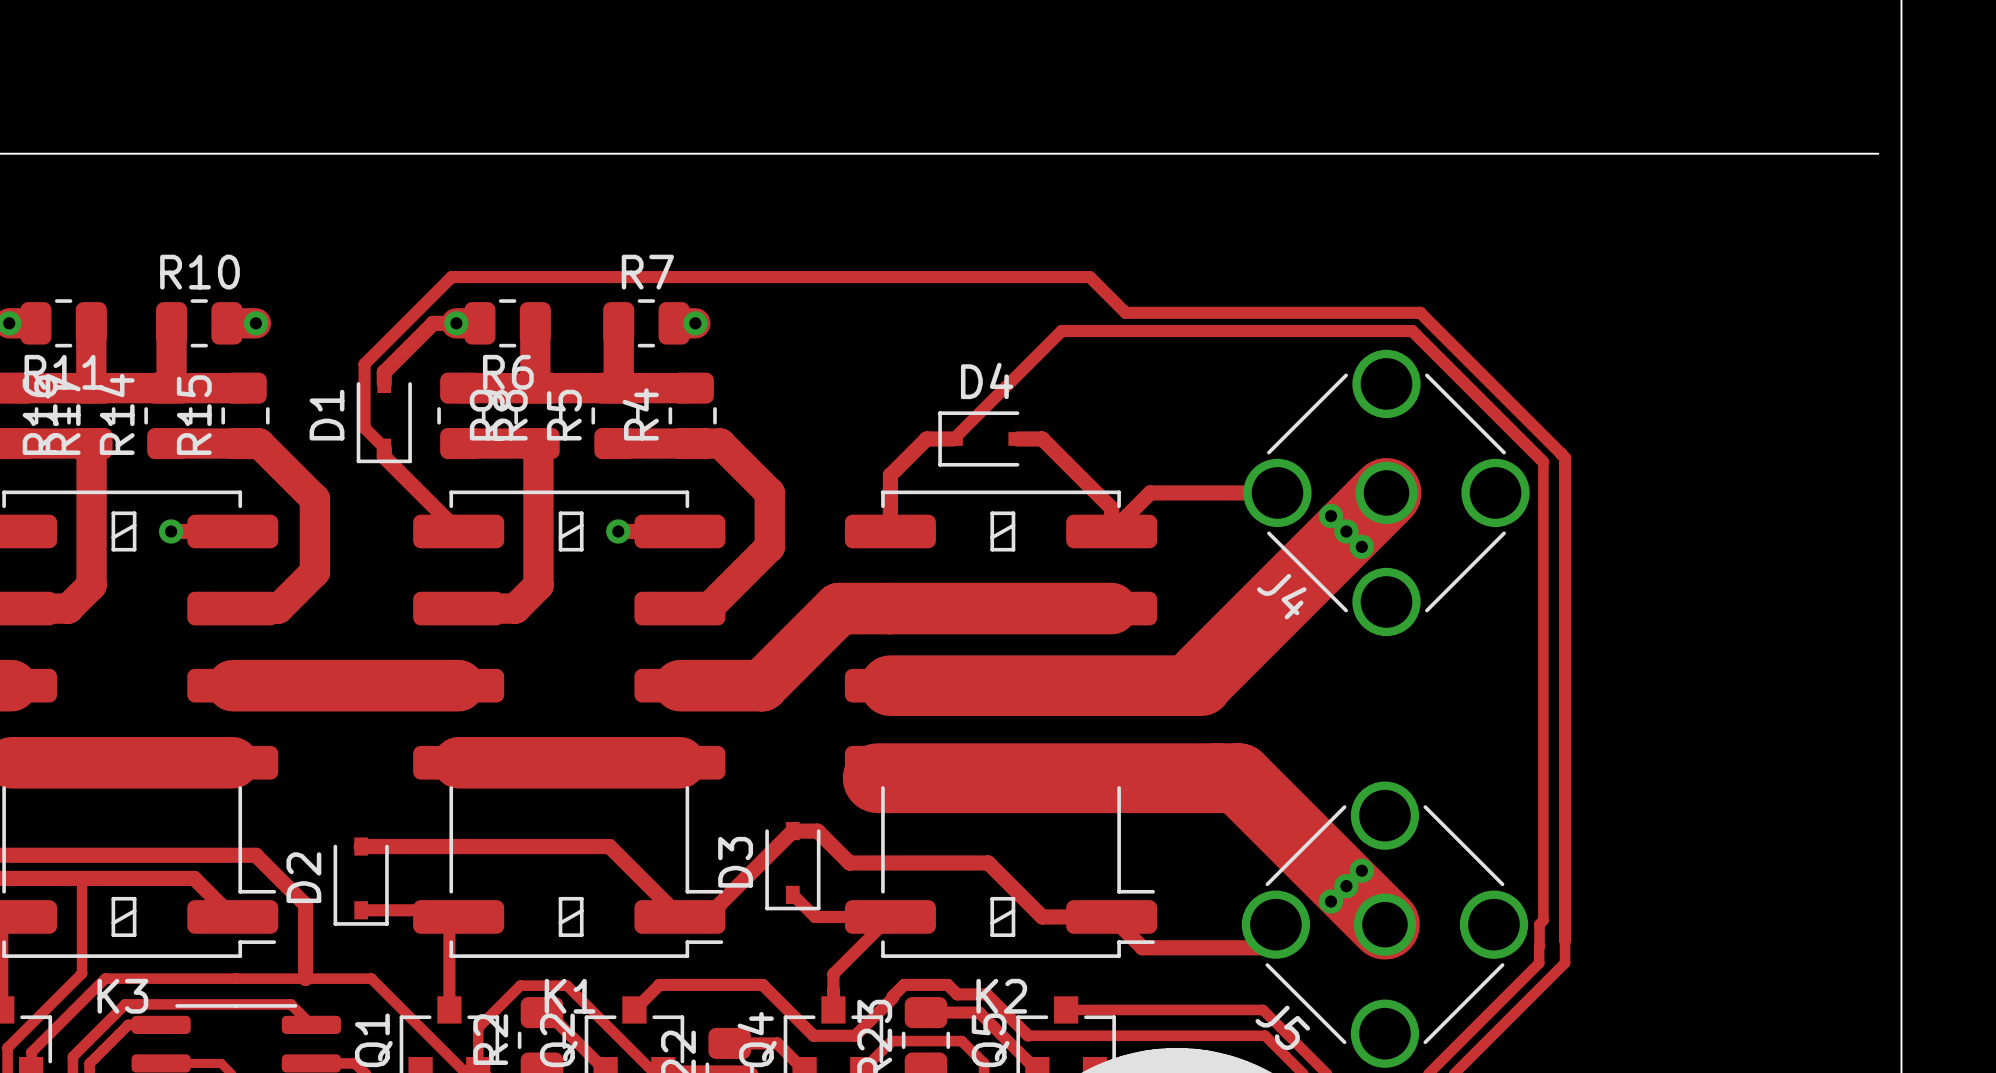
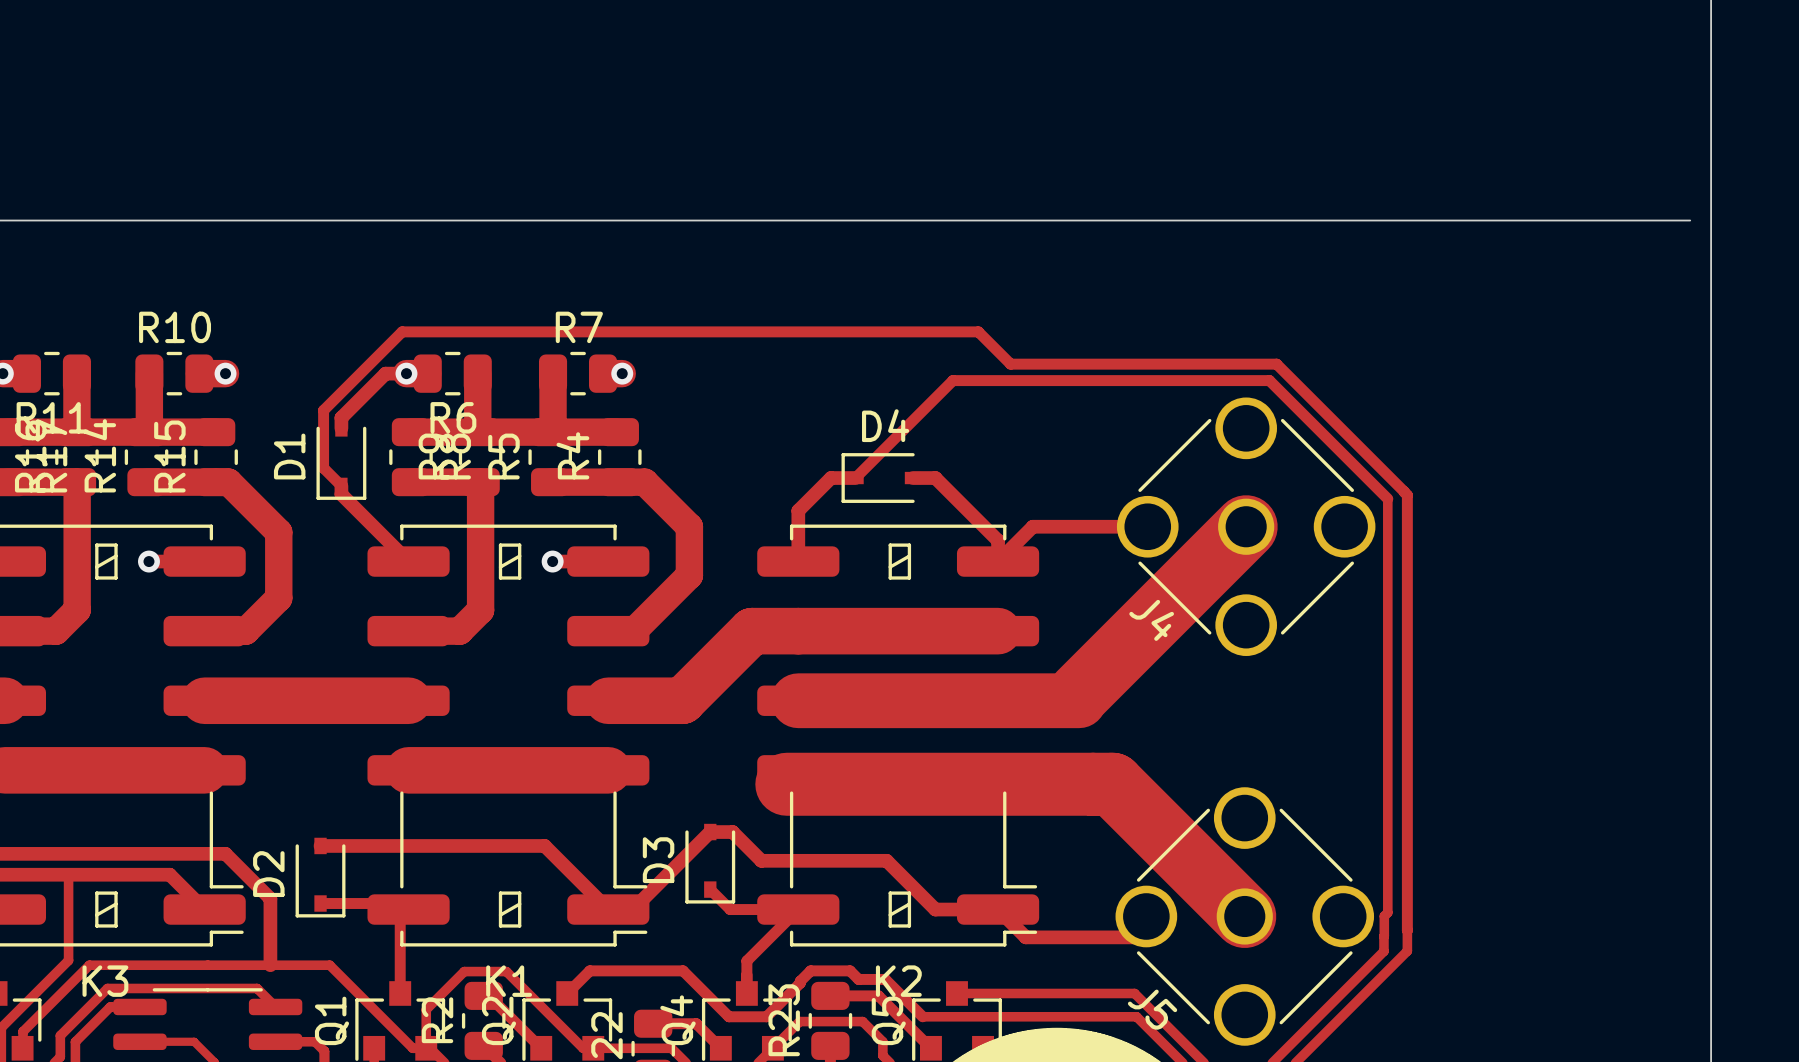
via: (1330, 516) -> none
via: (1346, 531) -> none
via: (1361, 546) -> none
via: (1361, 870) -> none
via: (1346, 886) -> none
via: (1330, 901) -> none

